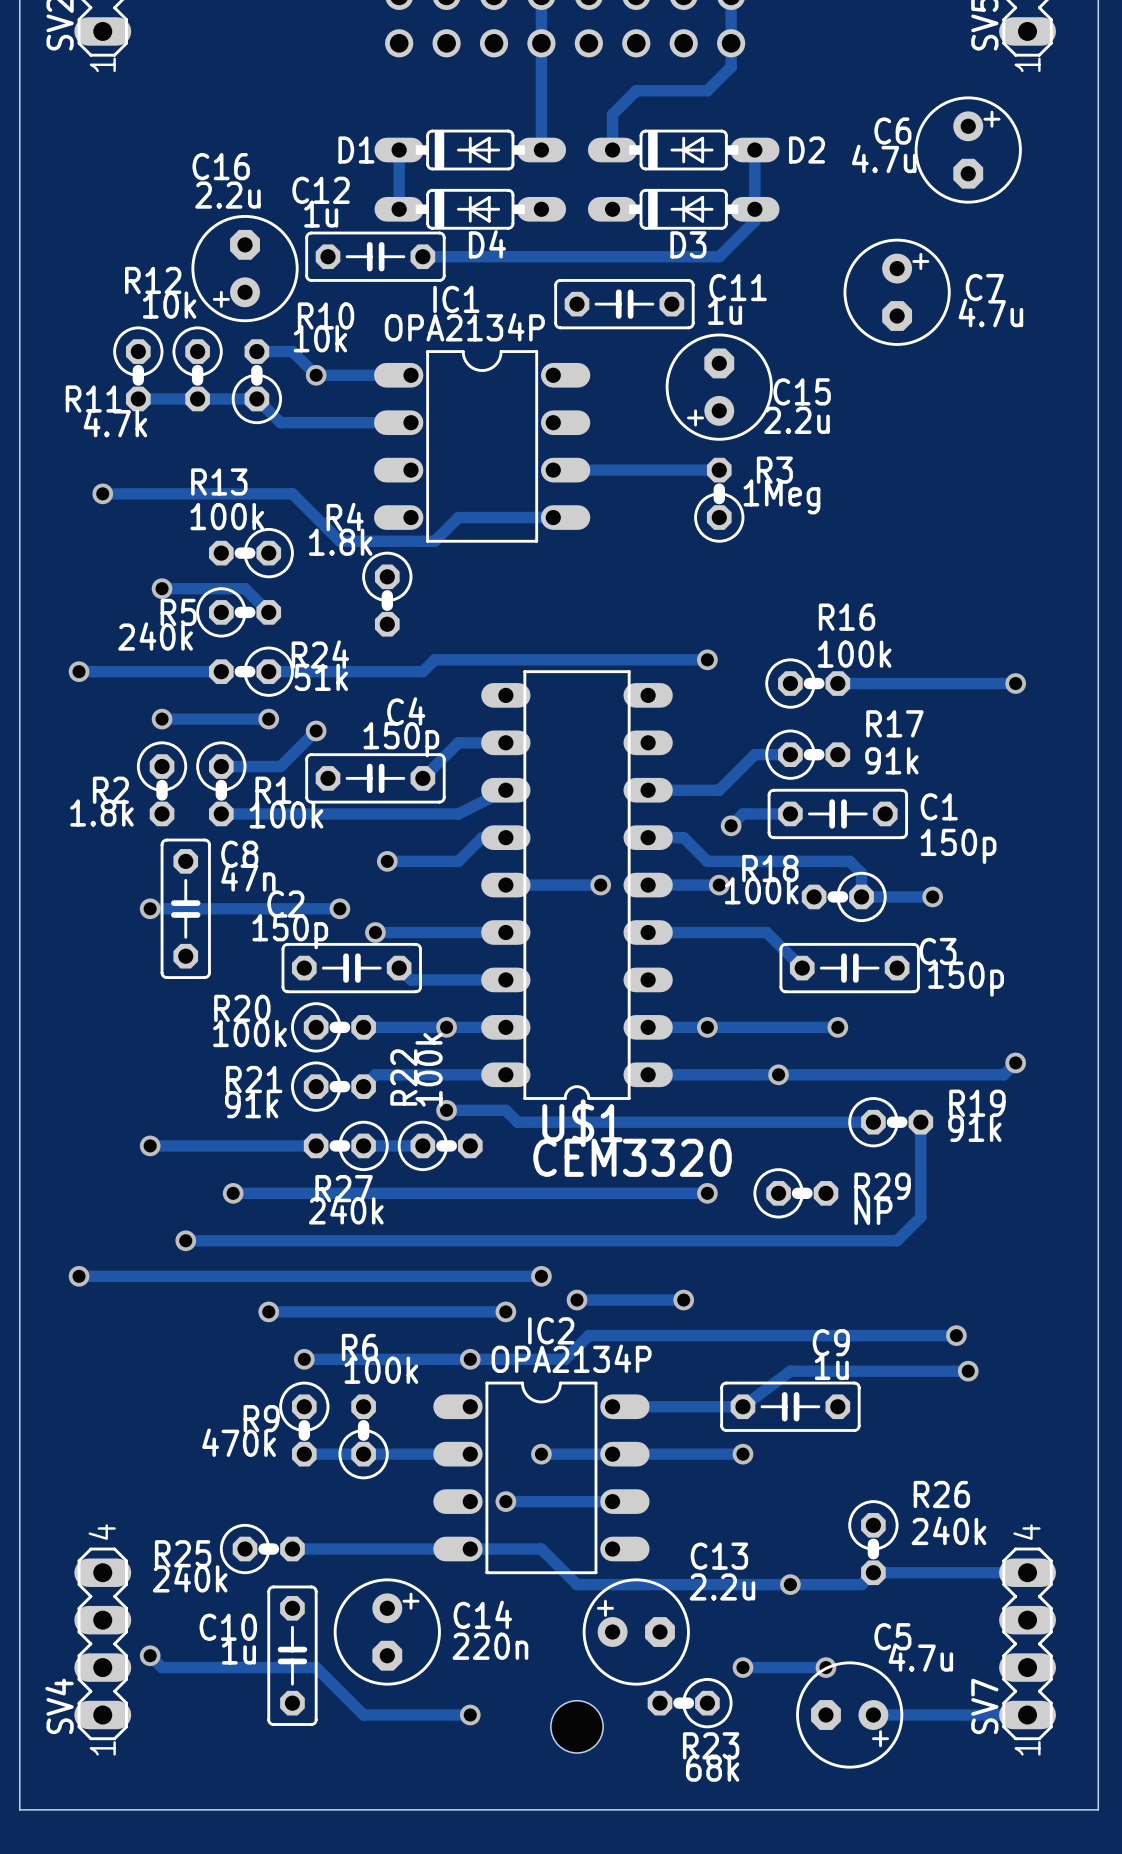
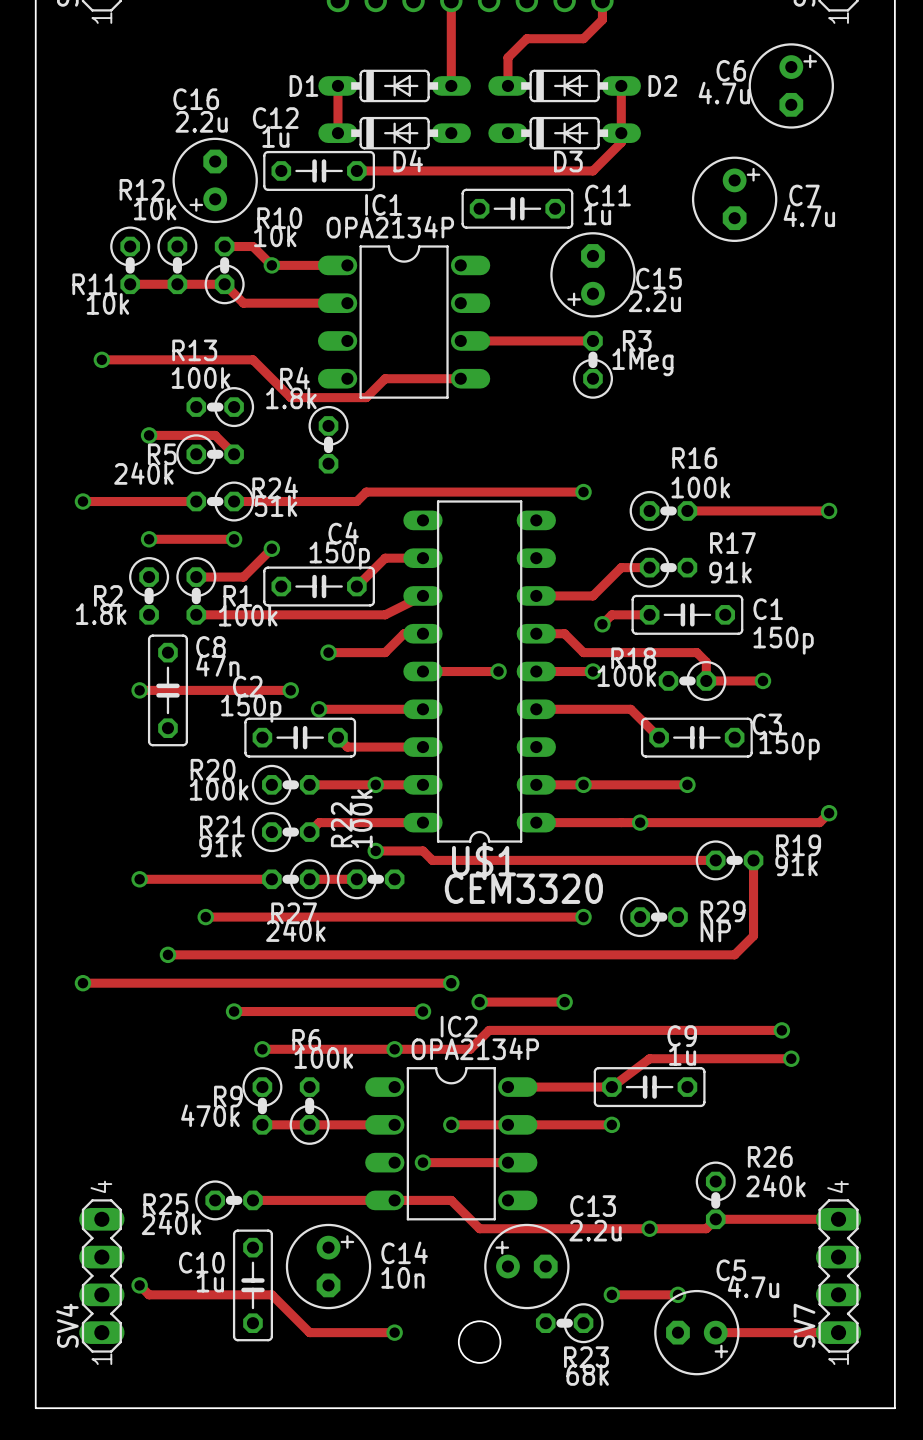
R11 value: 4.7k (115, 423) -> 10k (107, 303)
C14 value: 220n (490, 1646) -> 10n (402, 1277)

